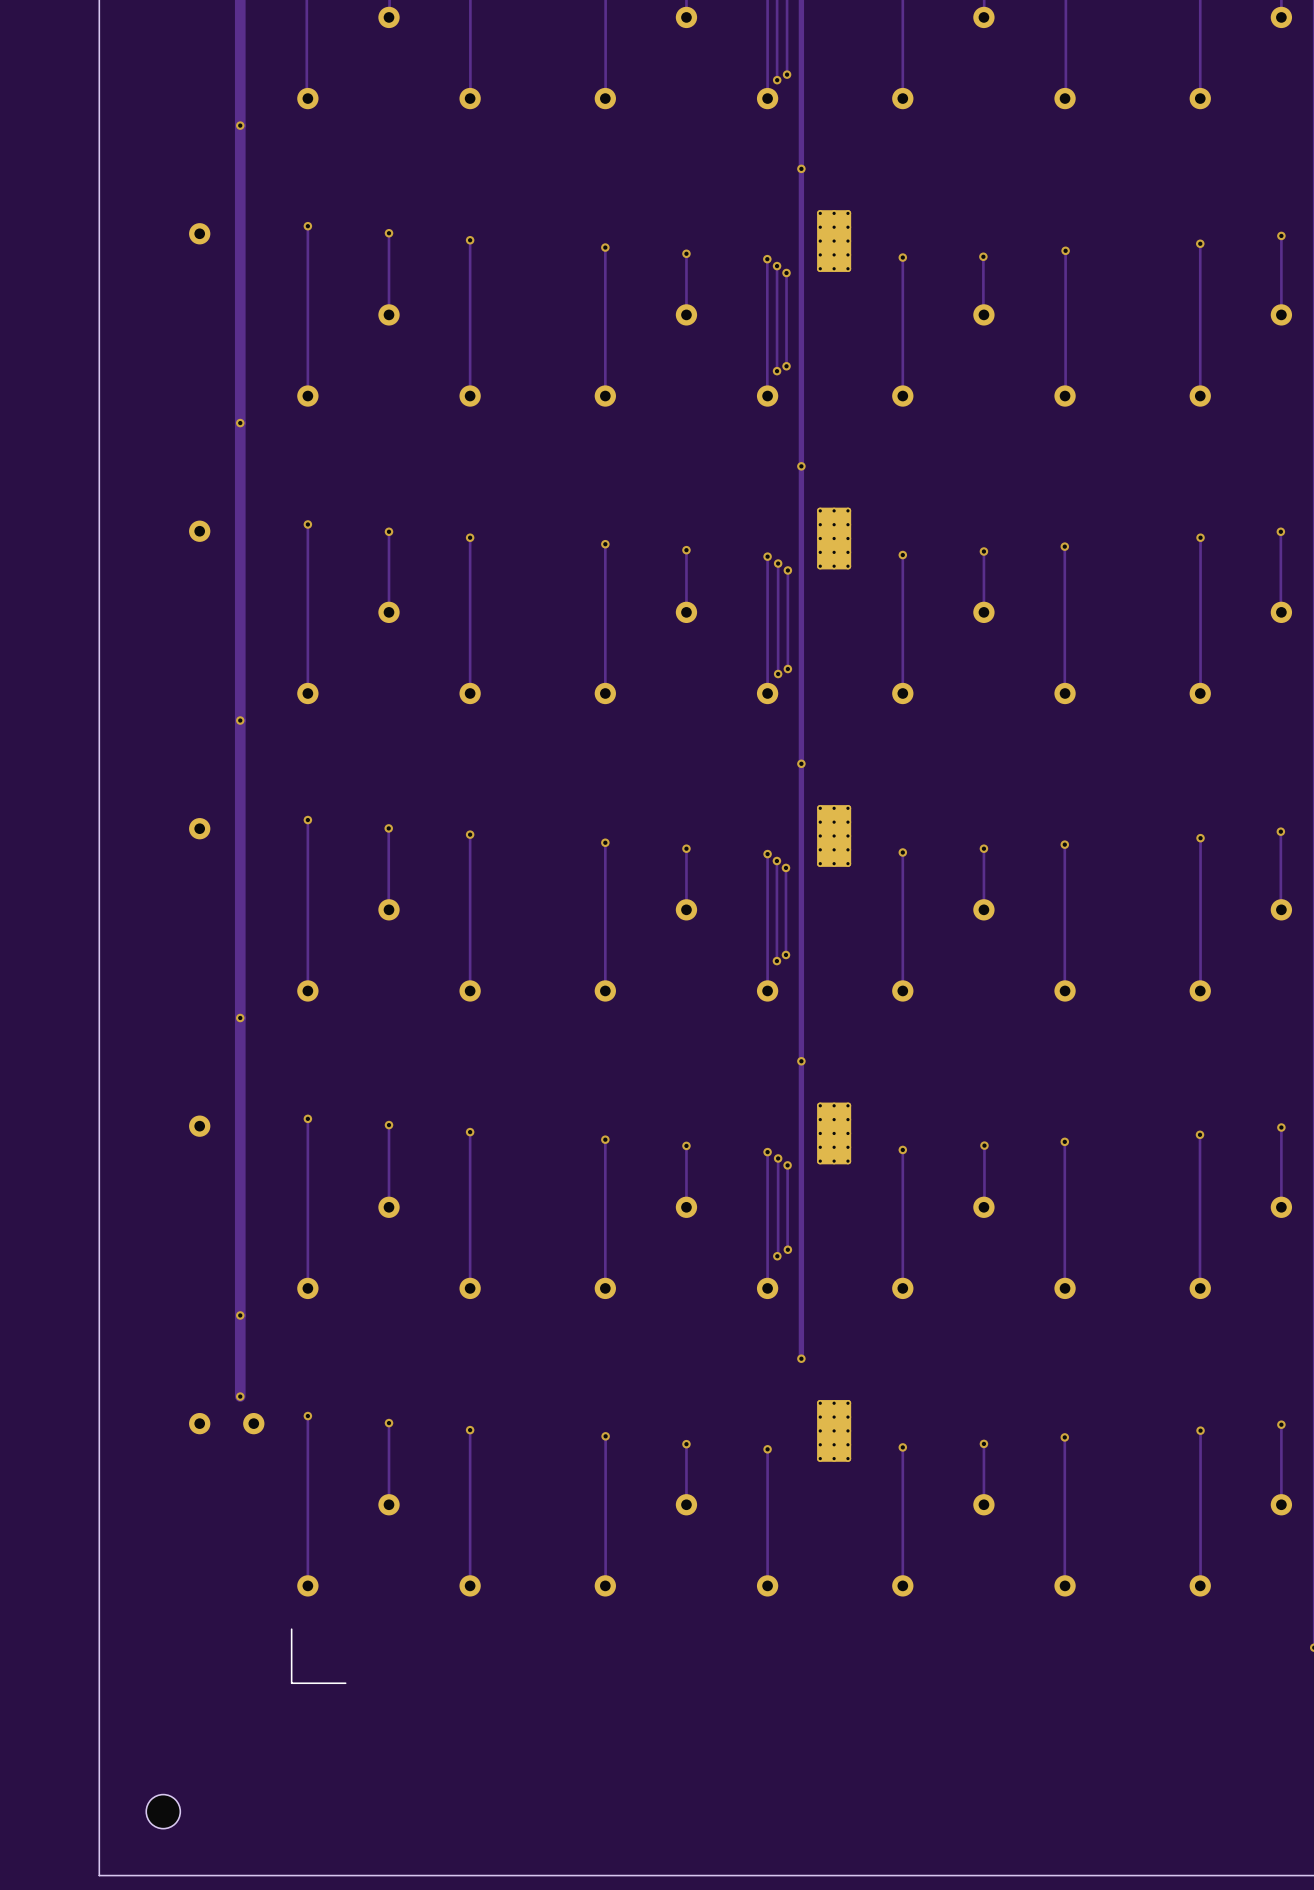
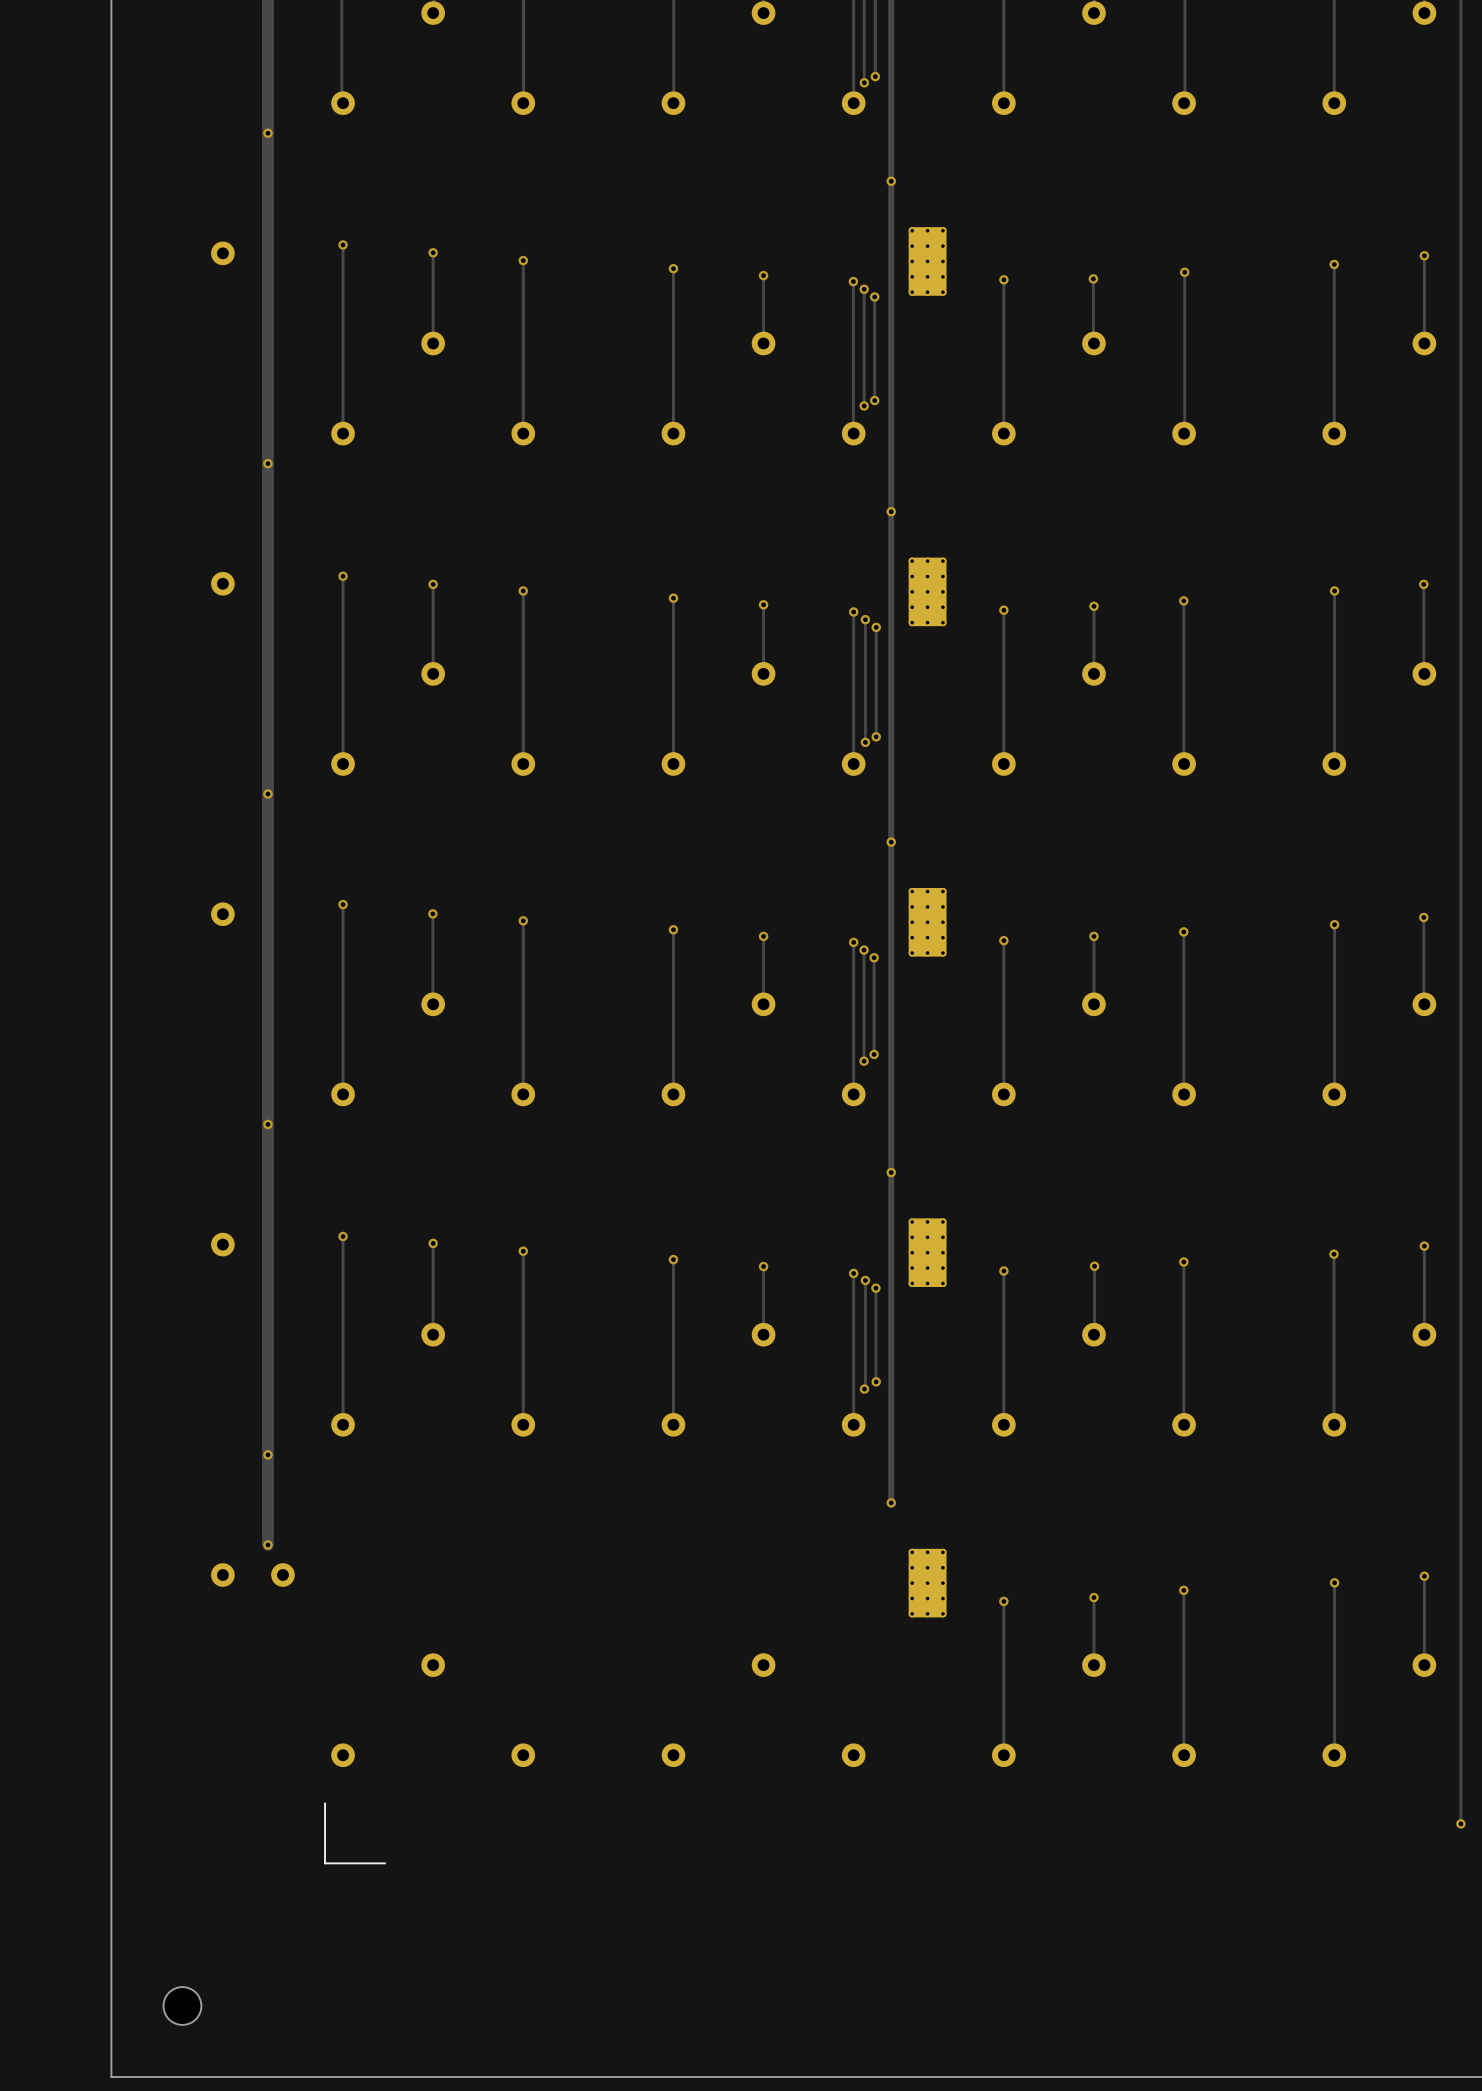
track: (307, 1416) (307, 1585) -> none
via: (307, 1416) -> none
track: (389, 1423) (389, 1504) -> none
via: (389, 1423) -> none
track: (470, 1430) (470, 1585) -> none
via: (470, 1430) -> none
track: (605, 1436) (605, 1585) -> none
via: (605, 1436) -> none
track: (686, 1444) (686, 1504) -> none
via: (686, 1444) -> none
track: (767, 1449) (767, 1585) -> none
via: (767, 1449) -> none

